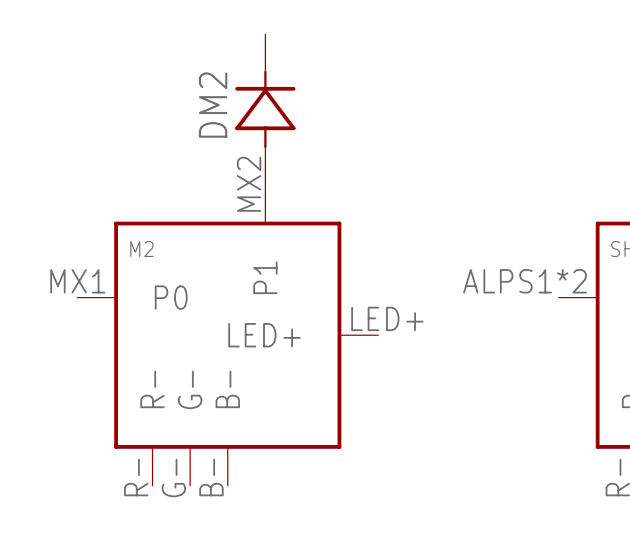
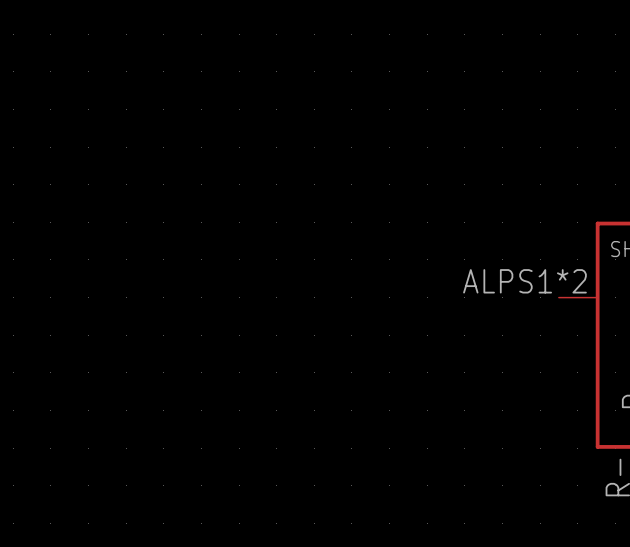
DM2: (265, 109) -> none
M2: (227, 335) -> none

